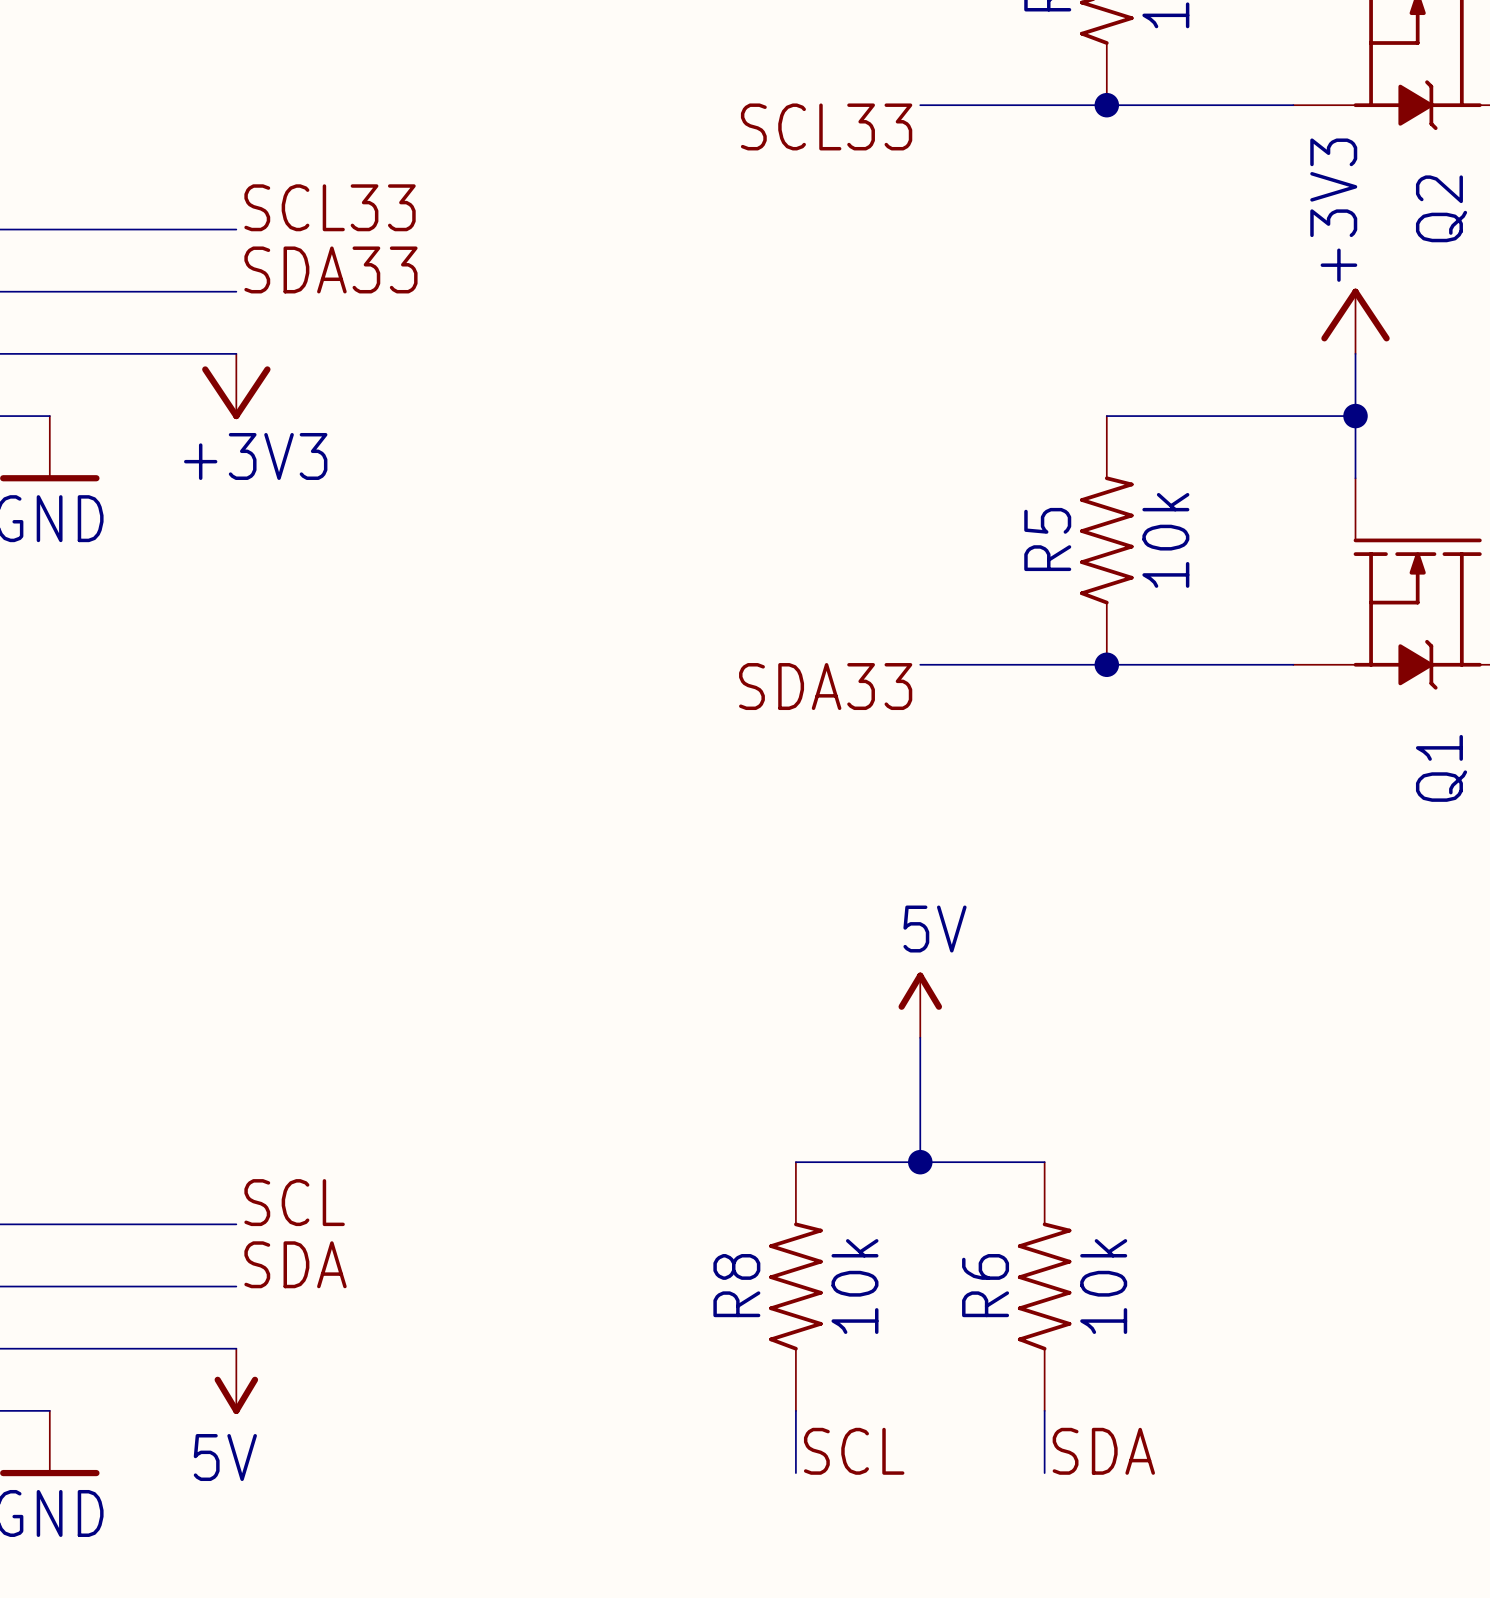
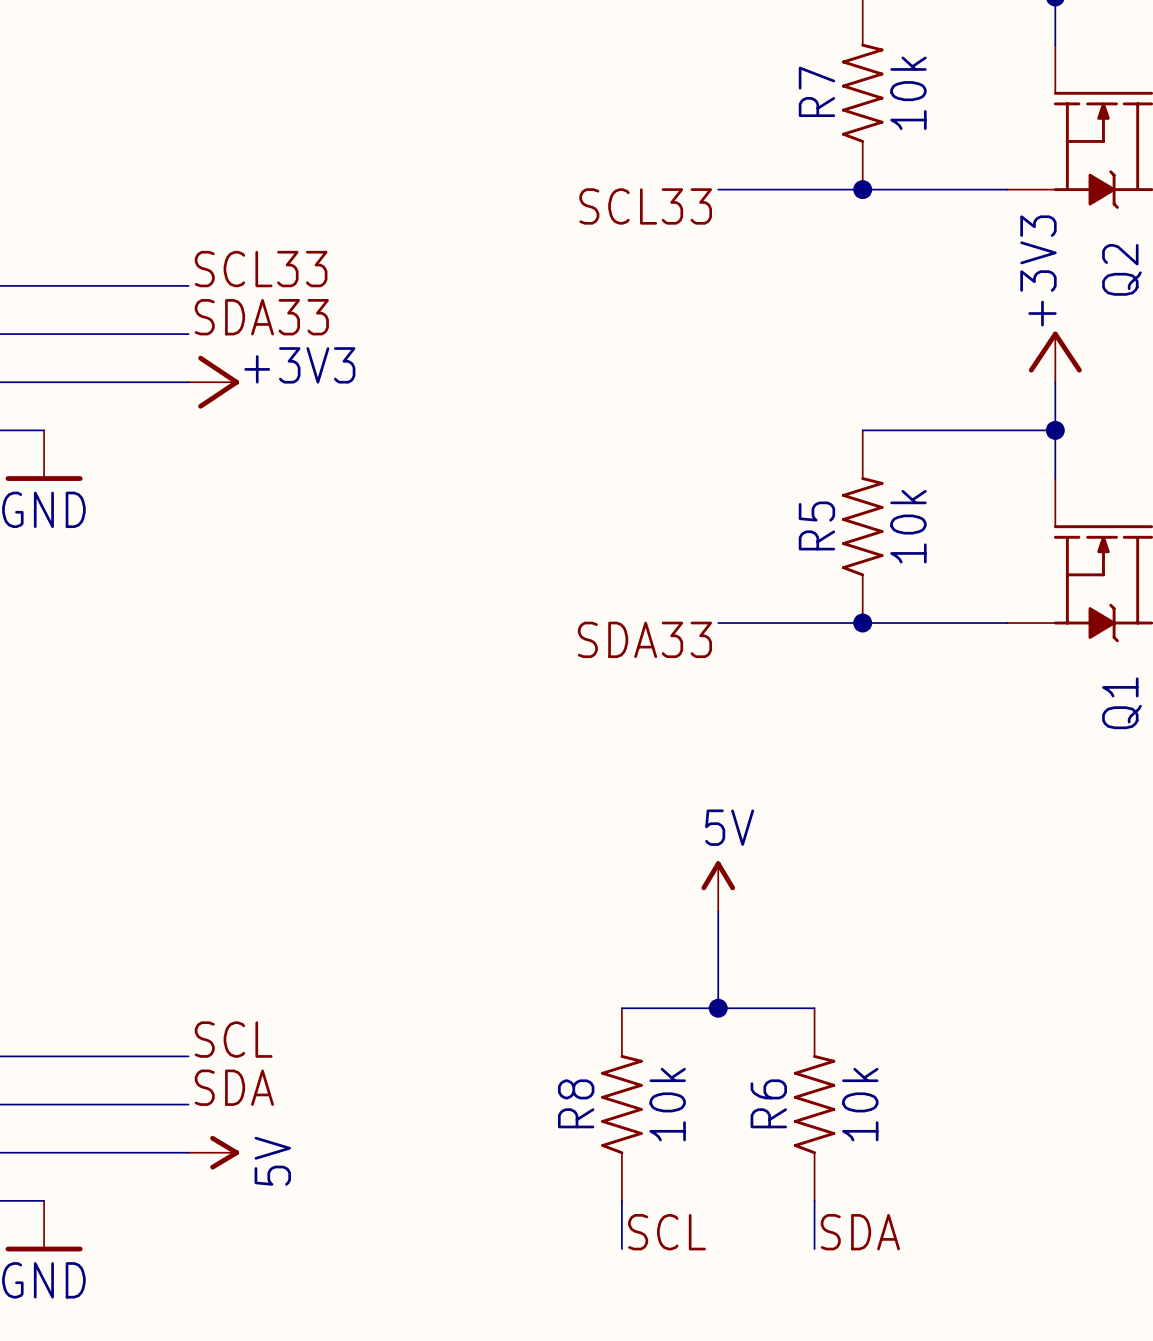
power symbol position: +3V3 (236, 386) -> +3V3 (213, 382)
power symbol rotation: 0° (236, 392) -> 90° counterclockwise (218, 382)
power symbol text position: +3V3 (255, 456) -> +3V3 (299, 365)
power symbol position: 5V (236, 1381) -> 5V (213, 1152)
power symbol rotation: 0° (236, 1395) -> 90° counterclockwise (224, 1152)

